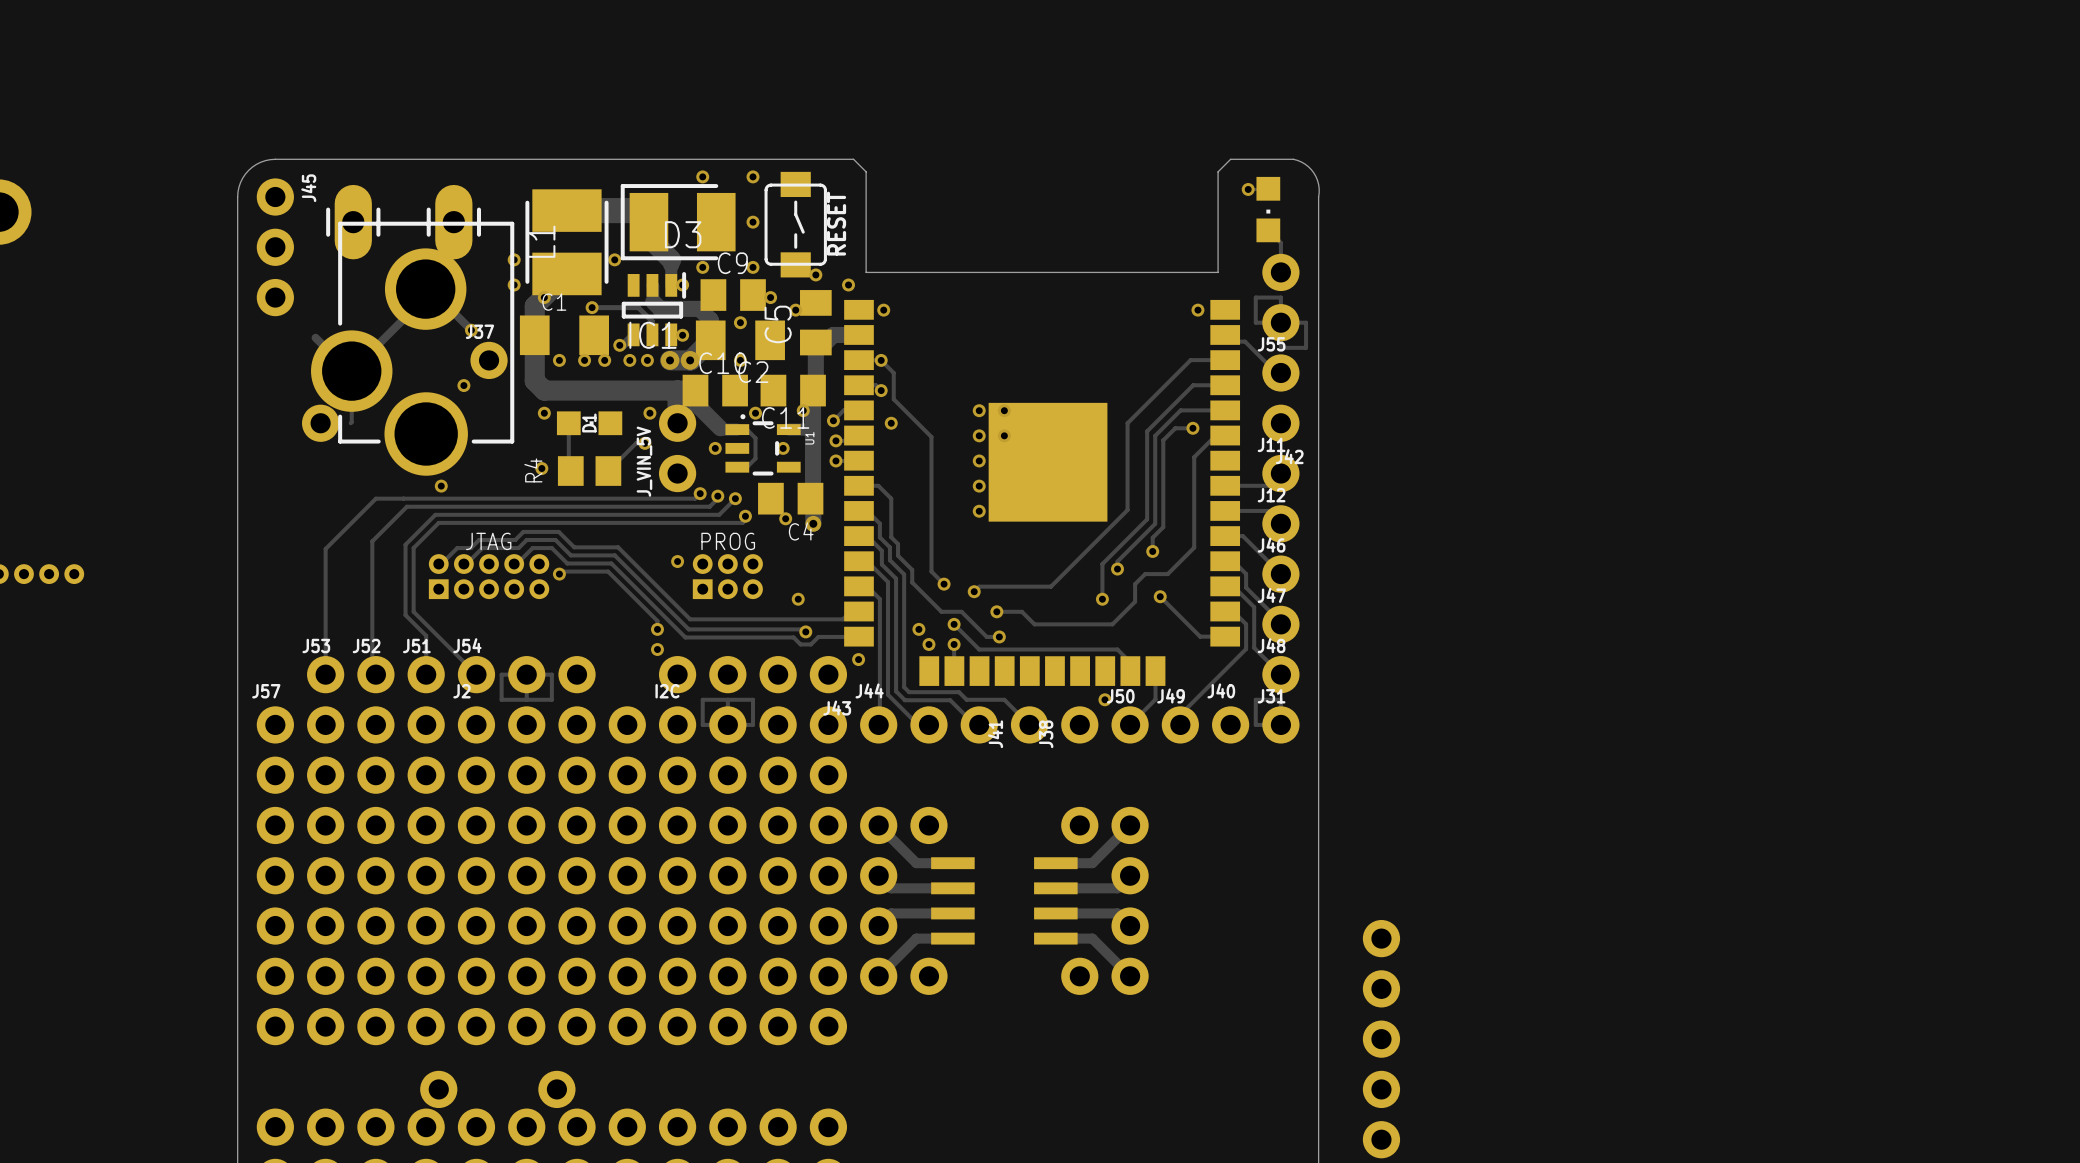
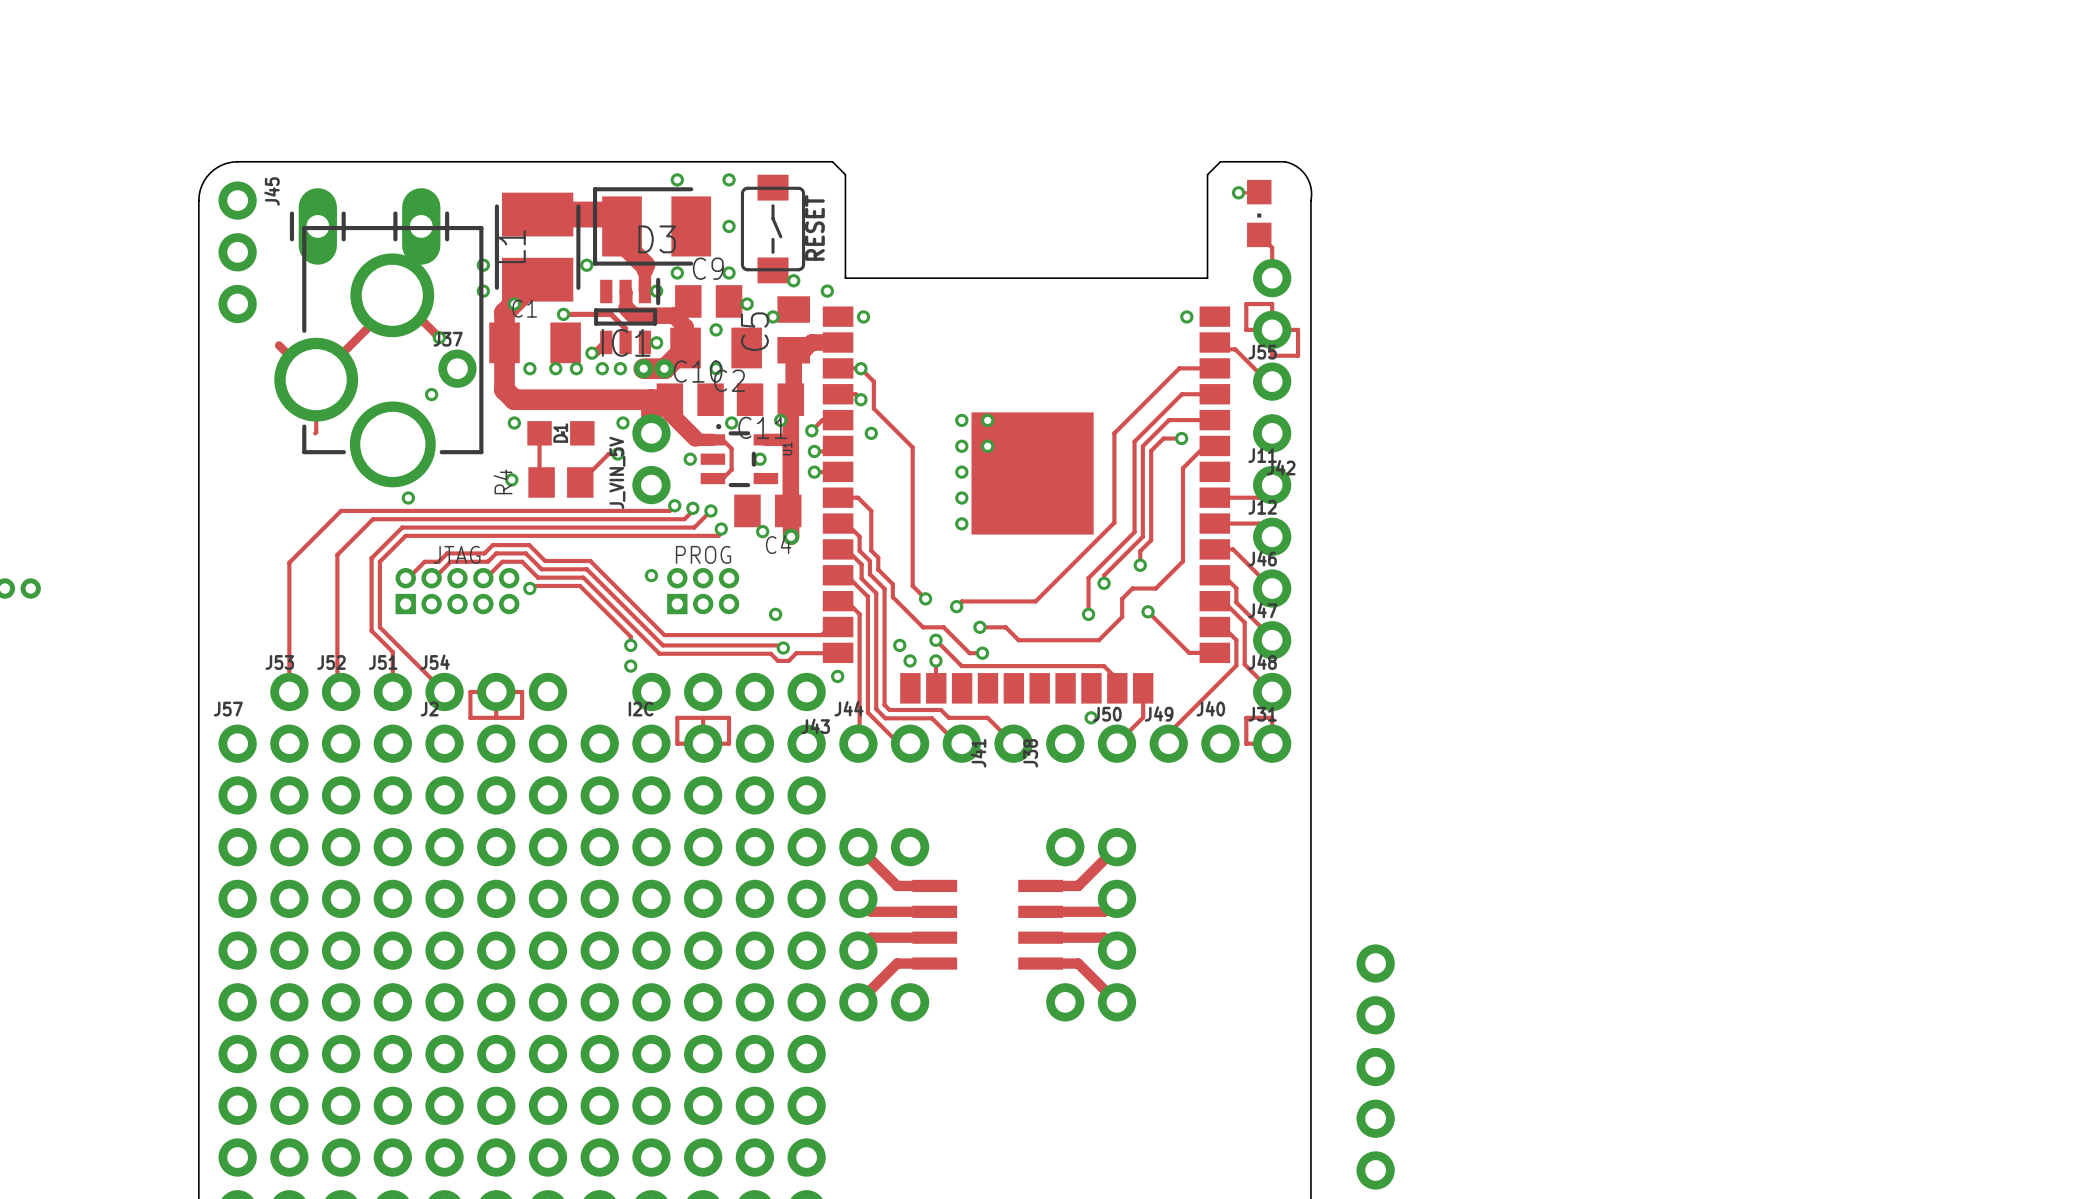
part: (320, 423) -> none
part footprint: [538, 1070, 576, 1109] -> [218, 1086, 826, 1125]
part: (438, 1089) -> none

